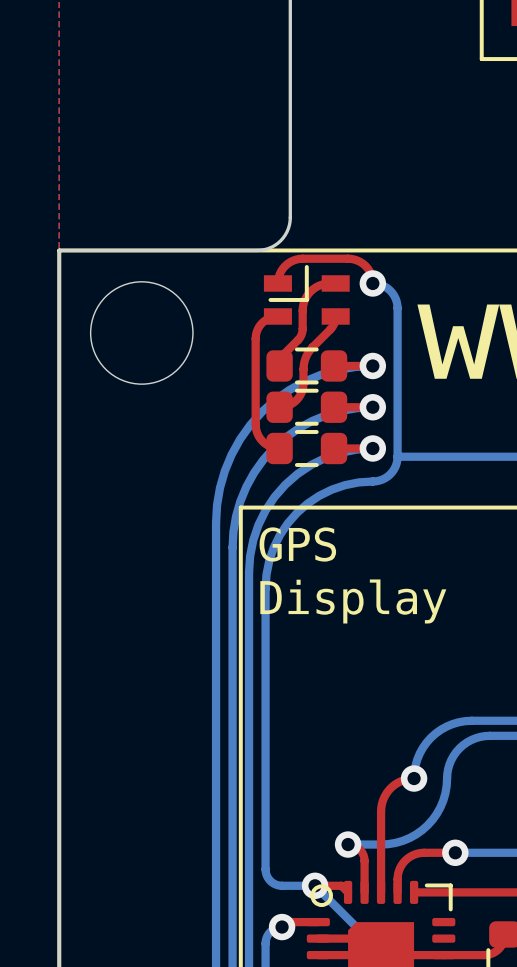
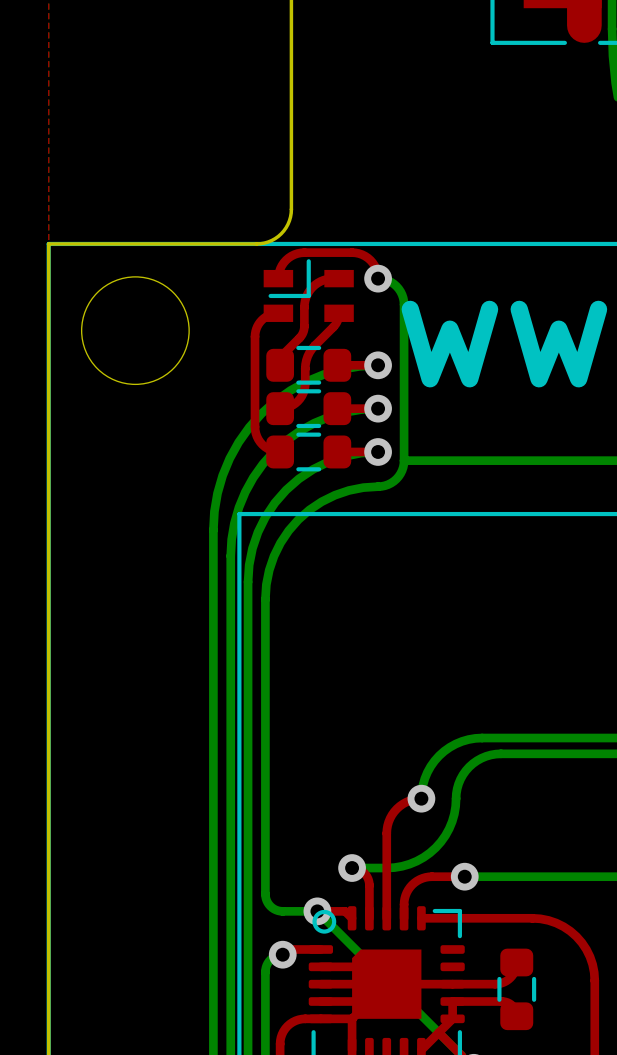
text: GPS (297, 544) -> none
text: Display (353, 601) -> none

